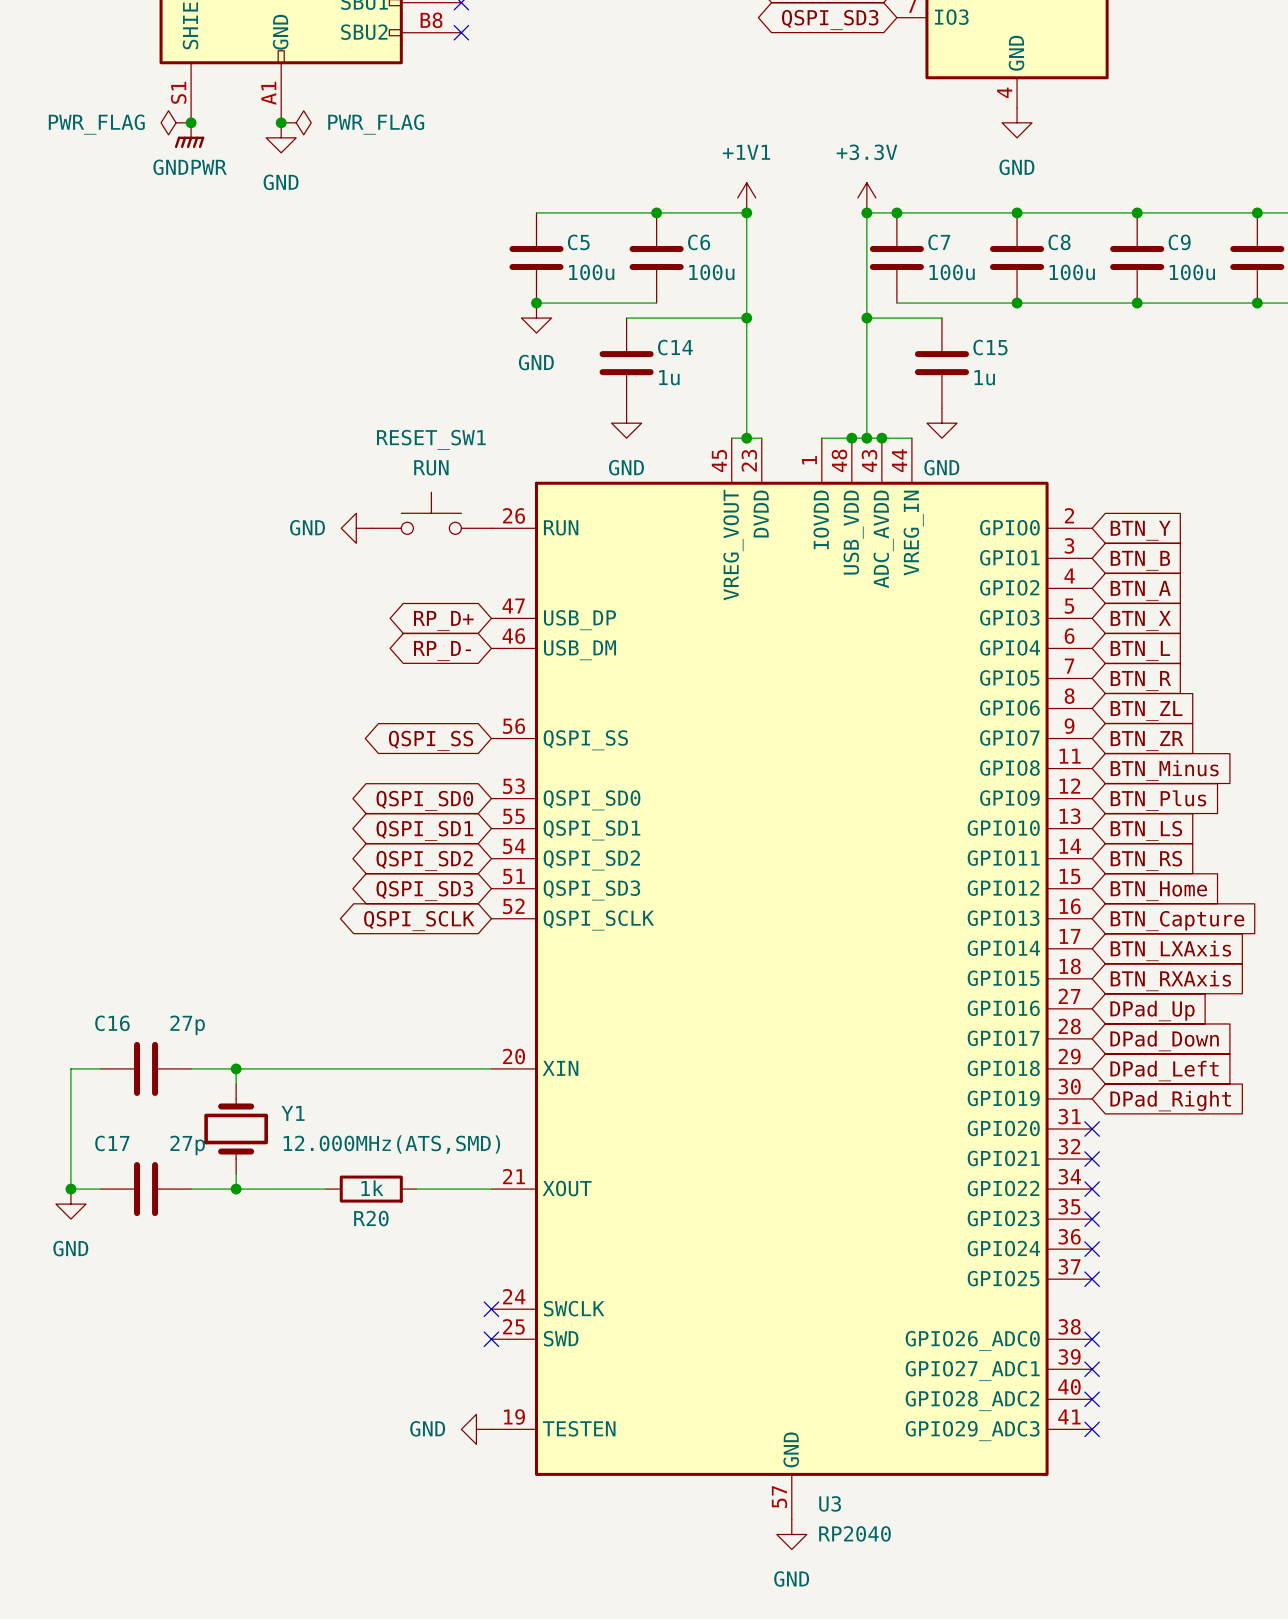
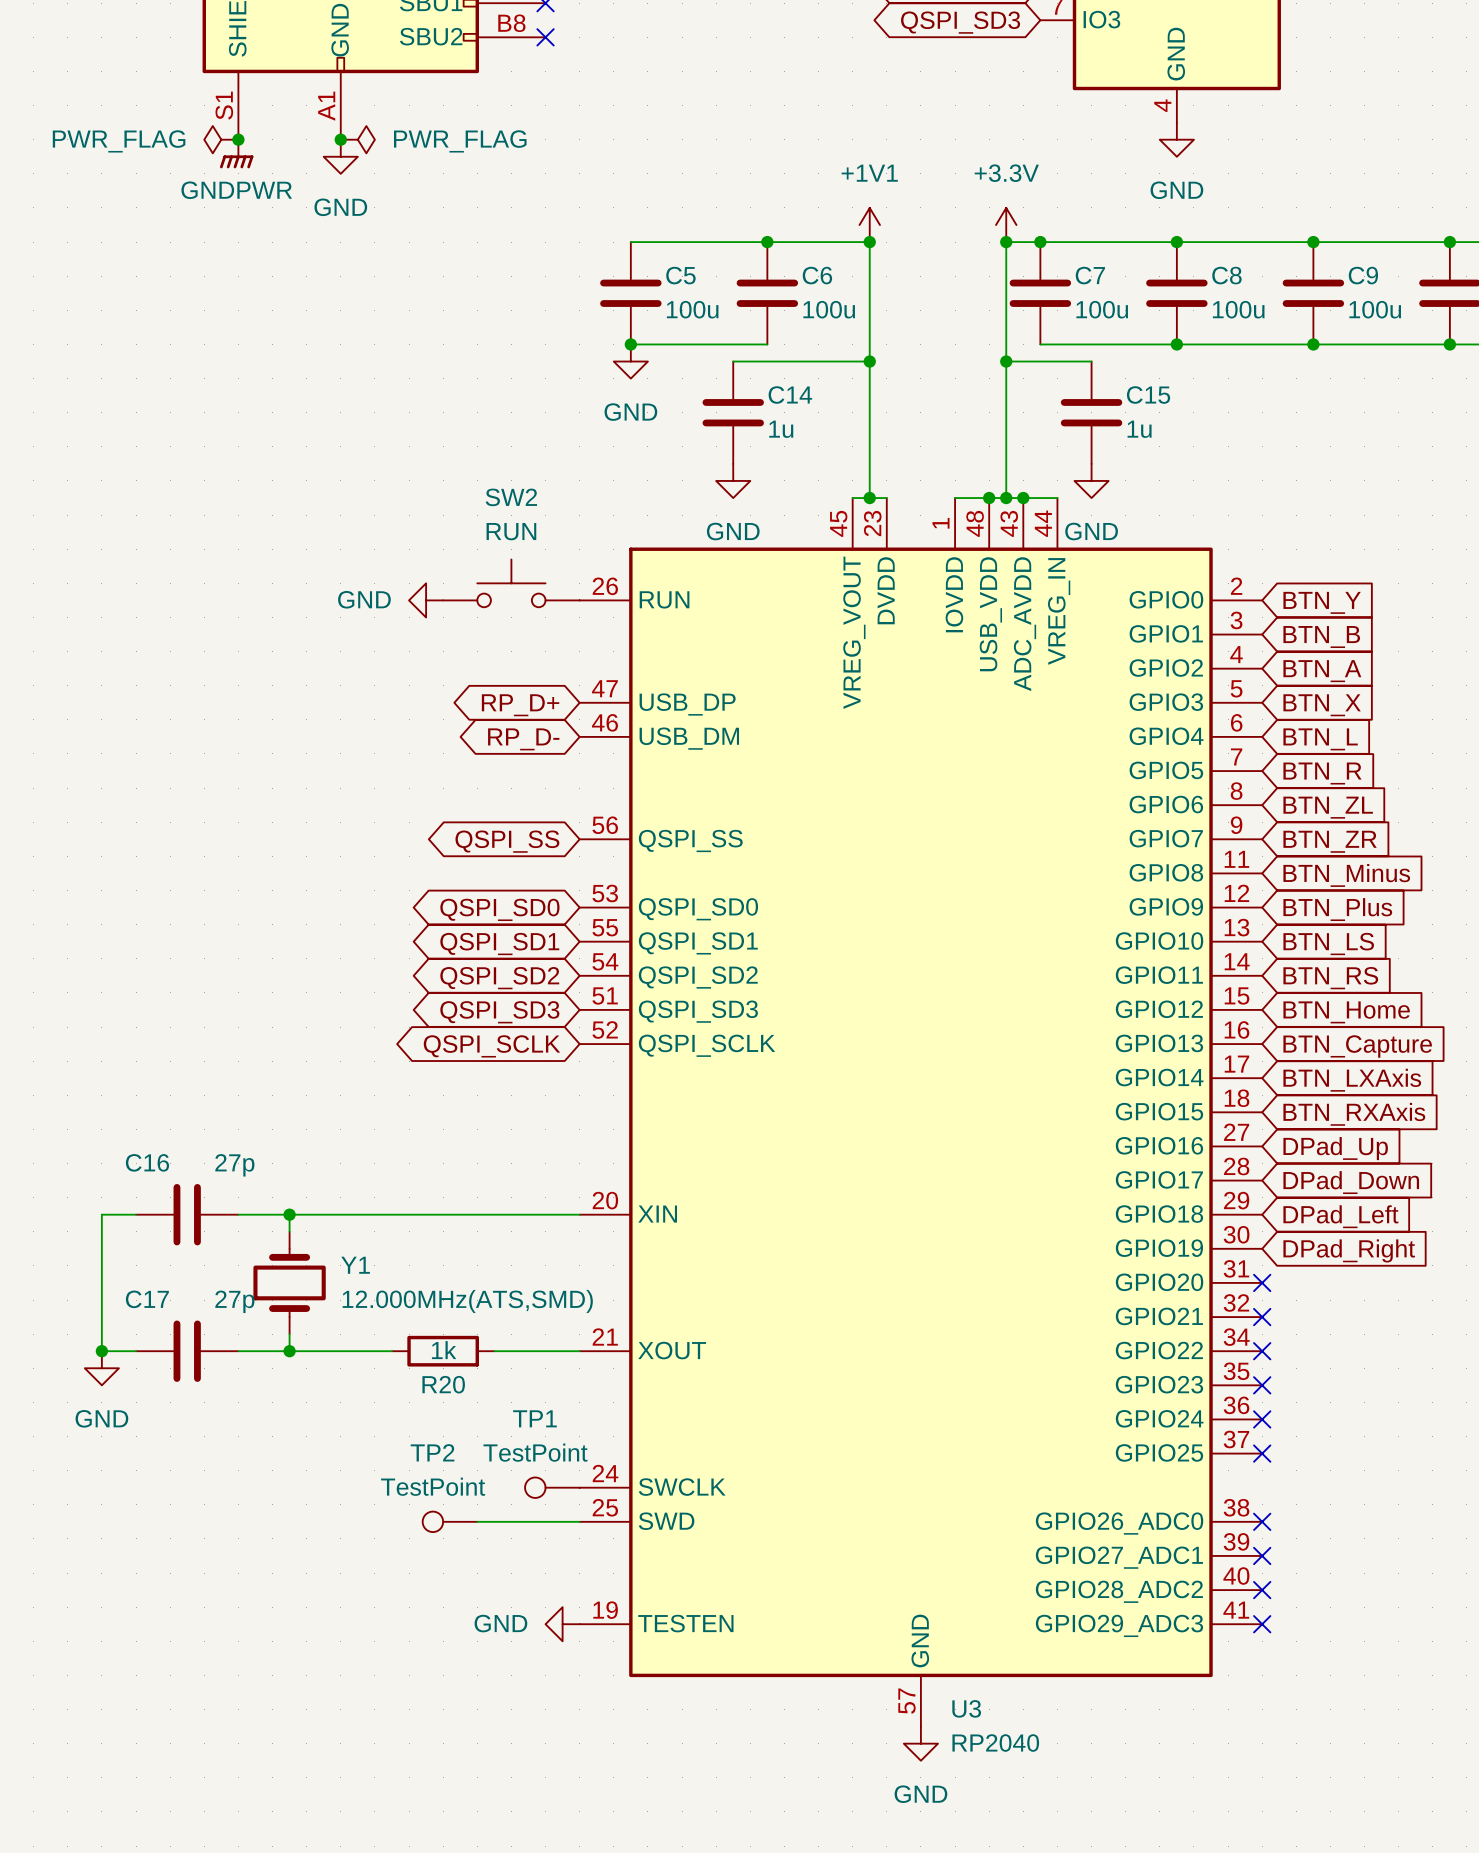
RESET_SW1 name: RESET_SW1 (431, 439) -> SW2 (511, 497)
TP1: none -> TestPoint (552, 1487)
no-connect mark: (491, 1309) -> none
TP2: none -> TestPoint (449, 1521)
wire: none -> (477, 1521) (579, 1521)
no-connect mark: (491, 1339) -> none

